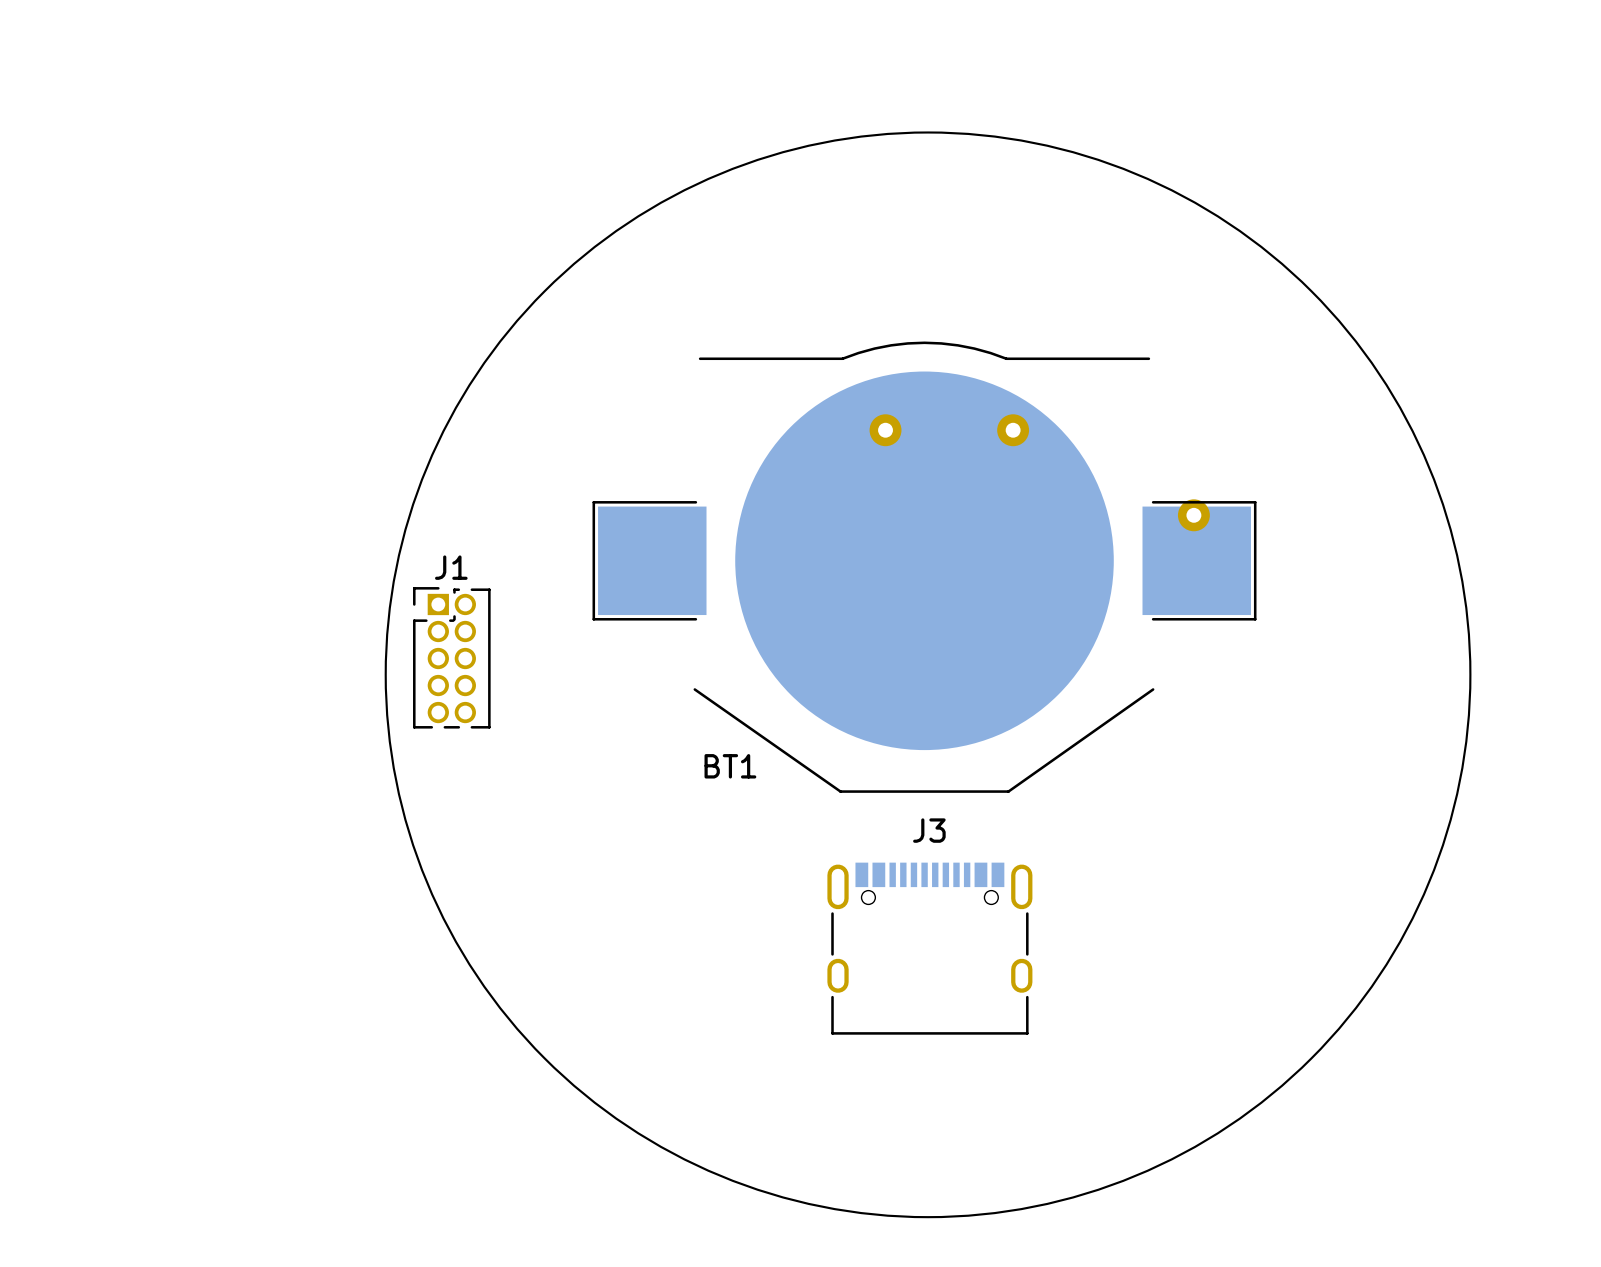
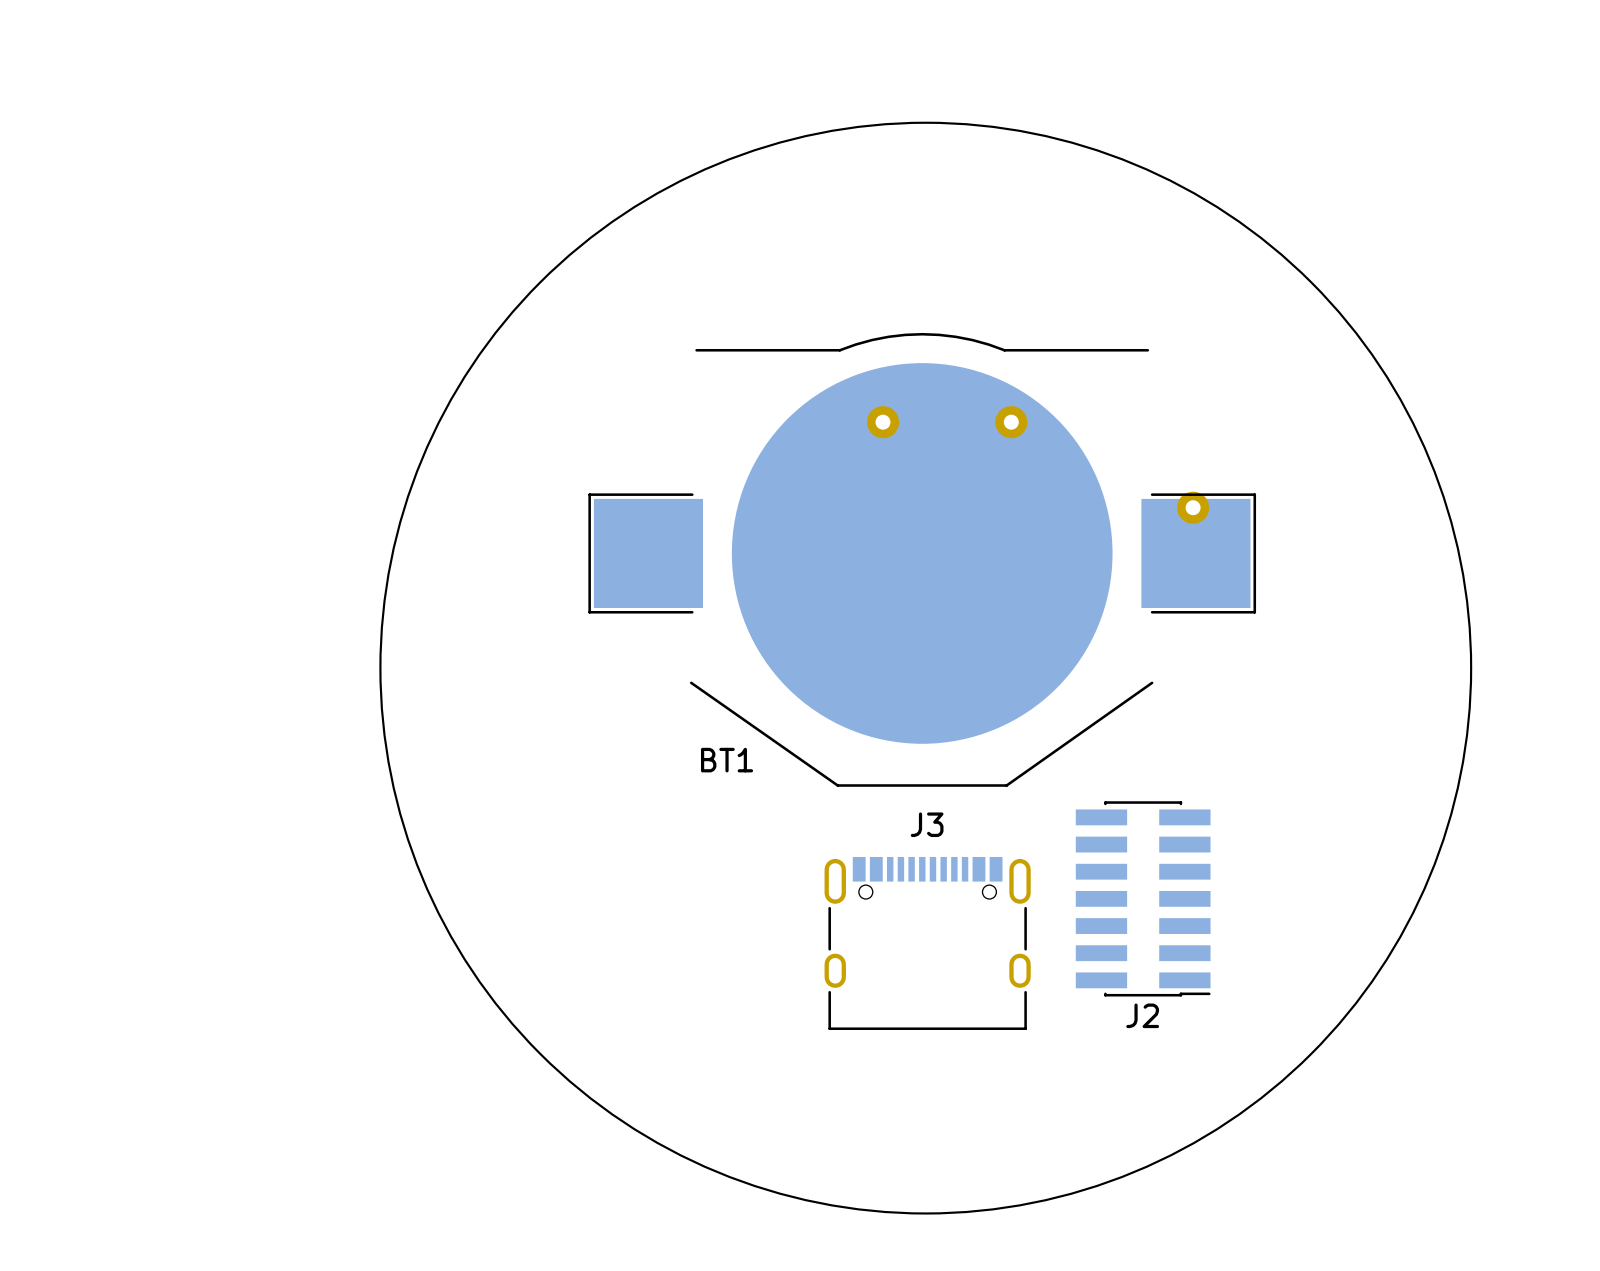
J1: (451, 657) -> none
J2: none -> (1143, 898)

